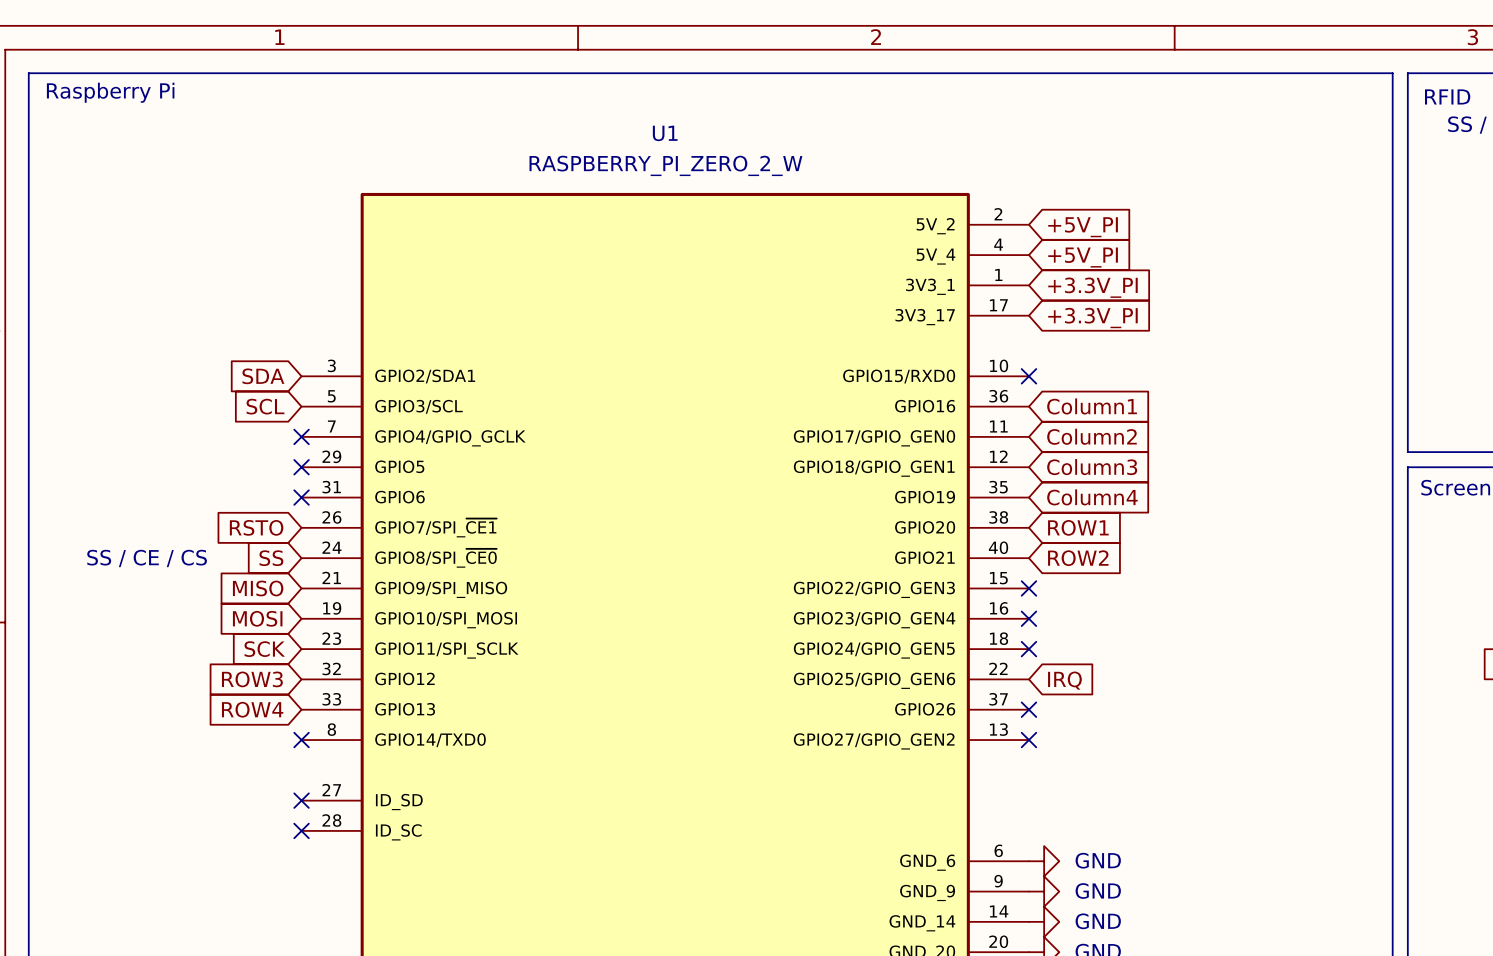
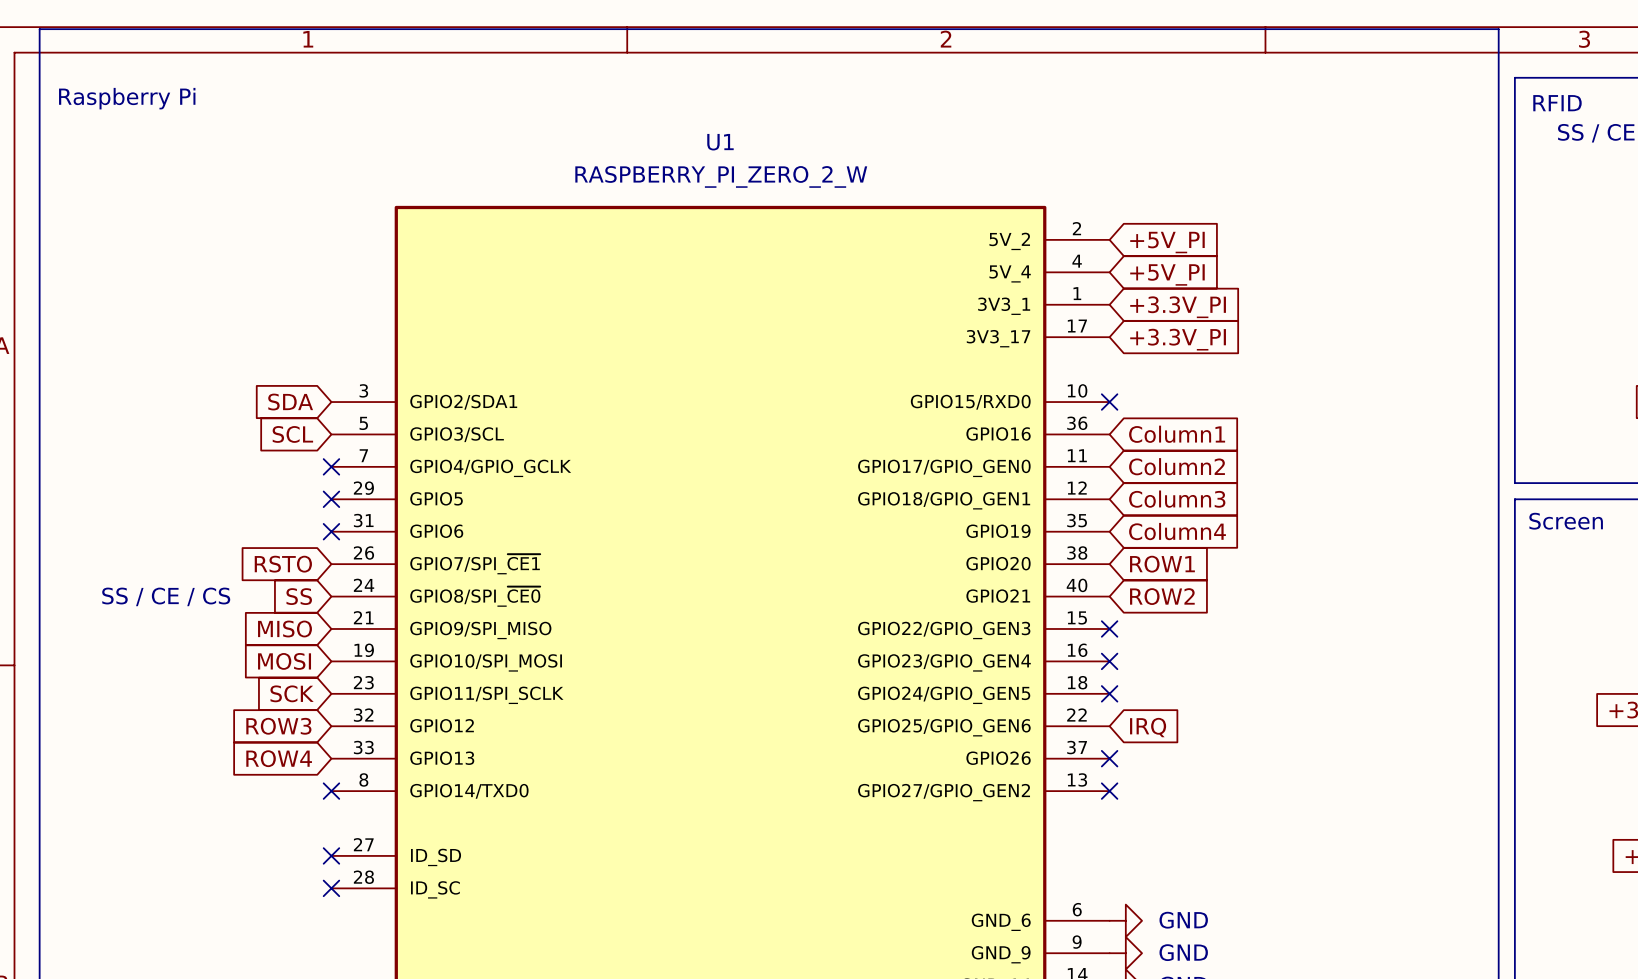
line: (28, 73) (1392, 73) -> (39, 77) (39, 29) (1498, 29) (1498, 77)

